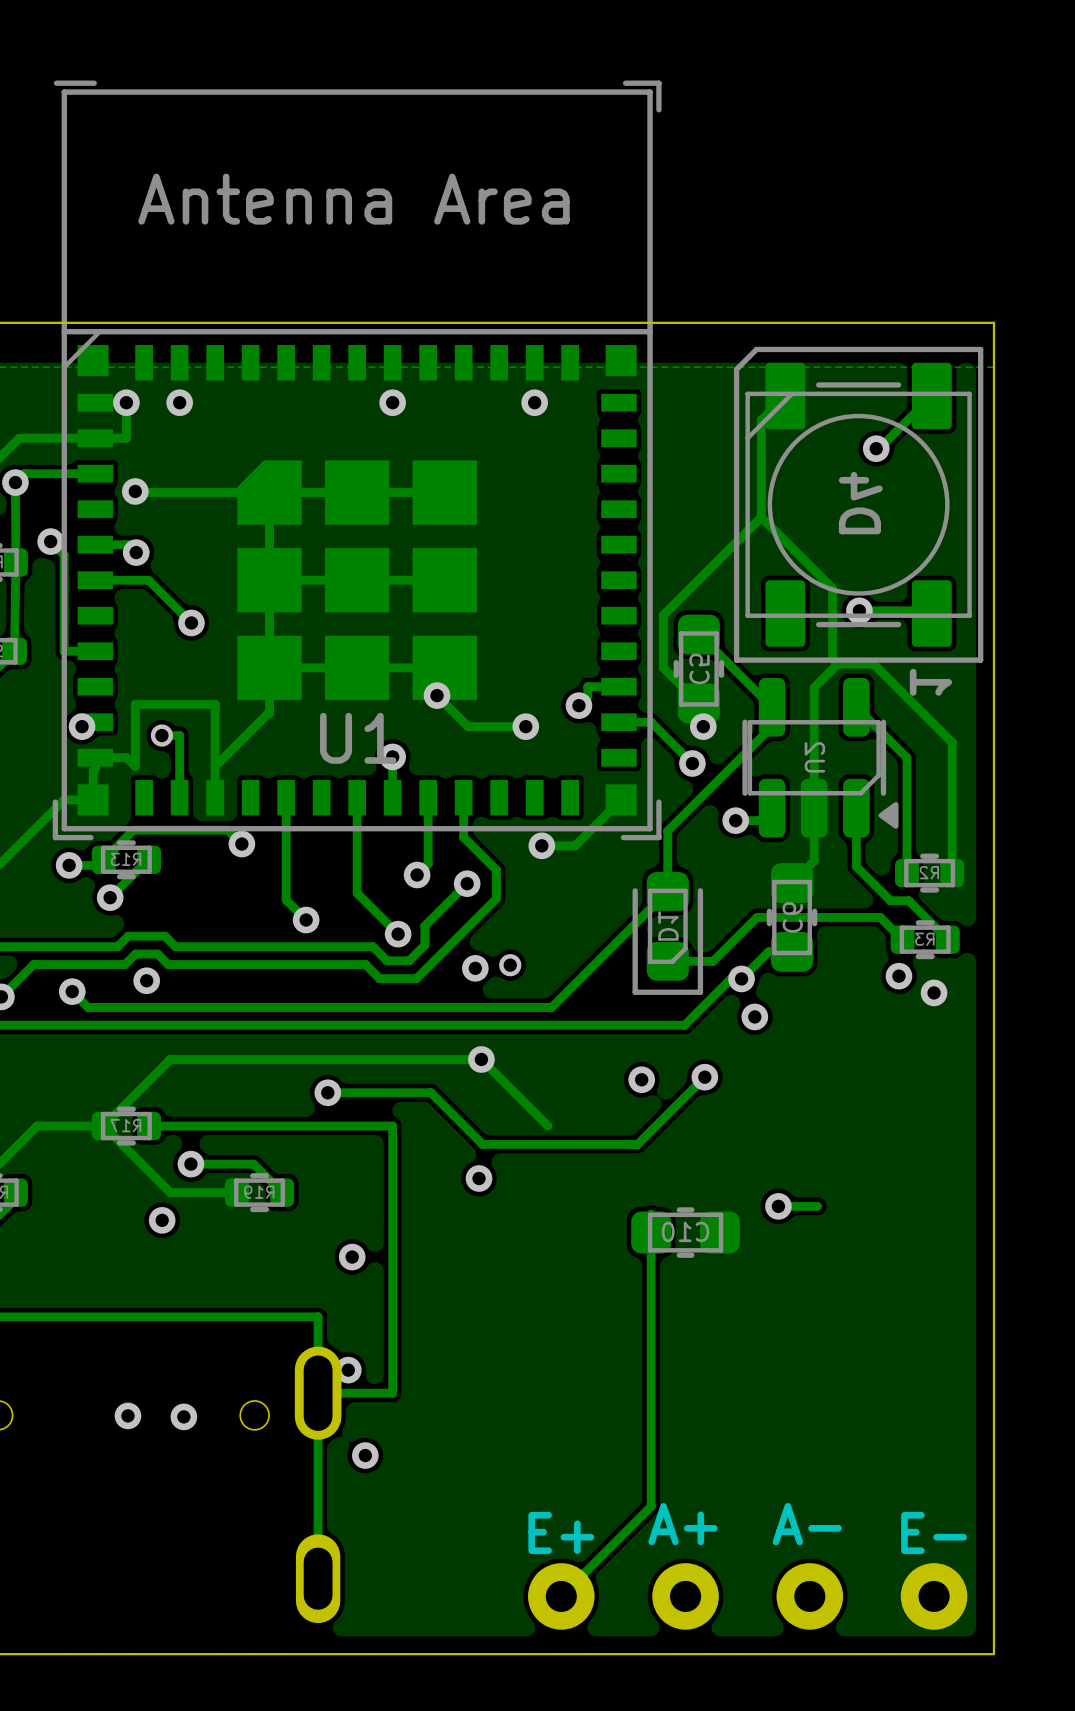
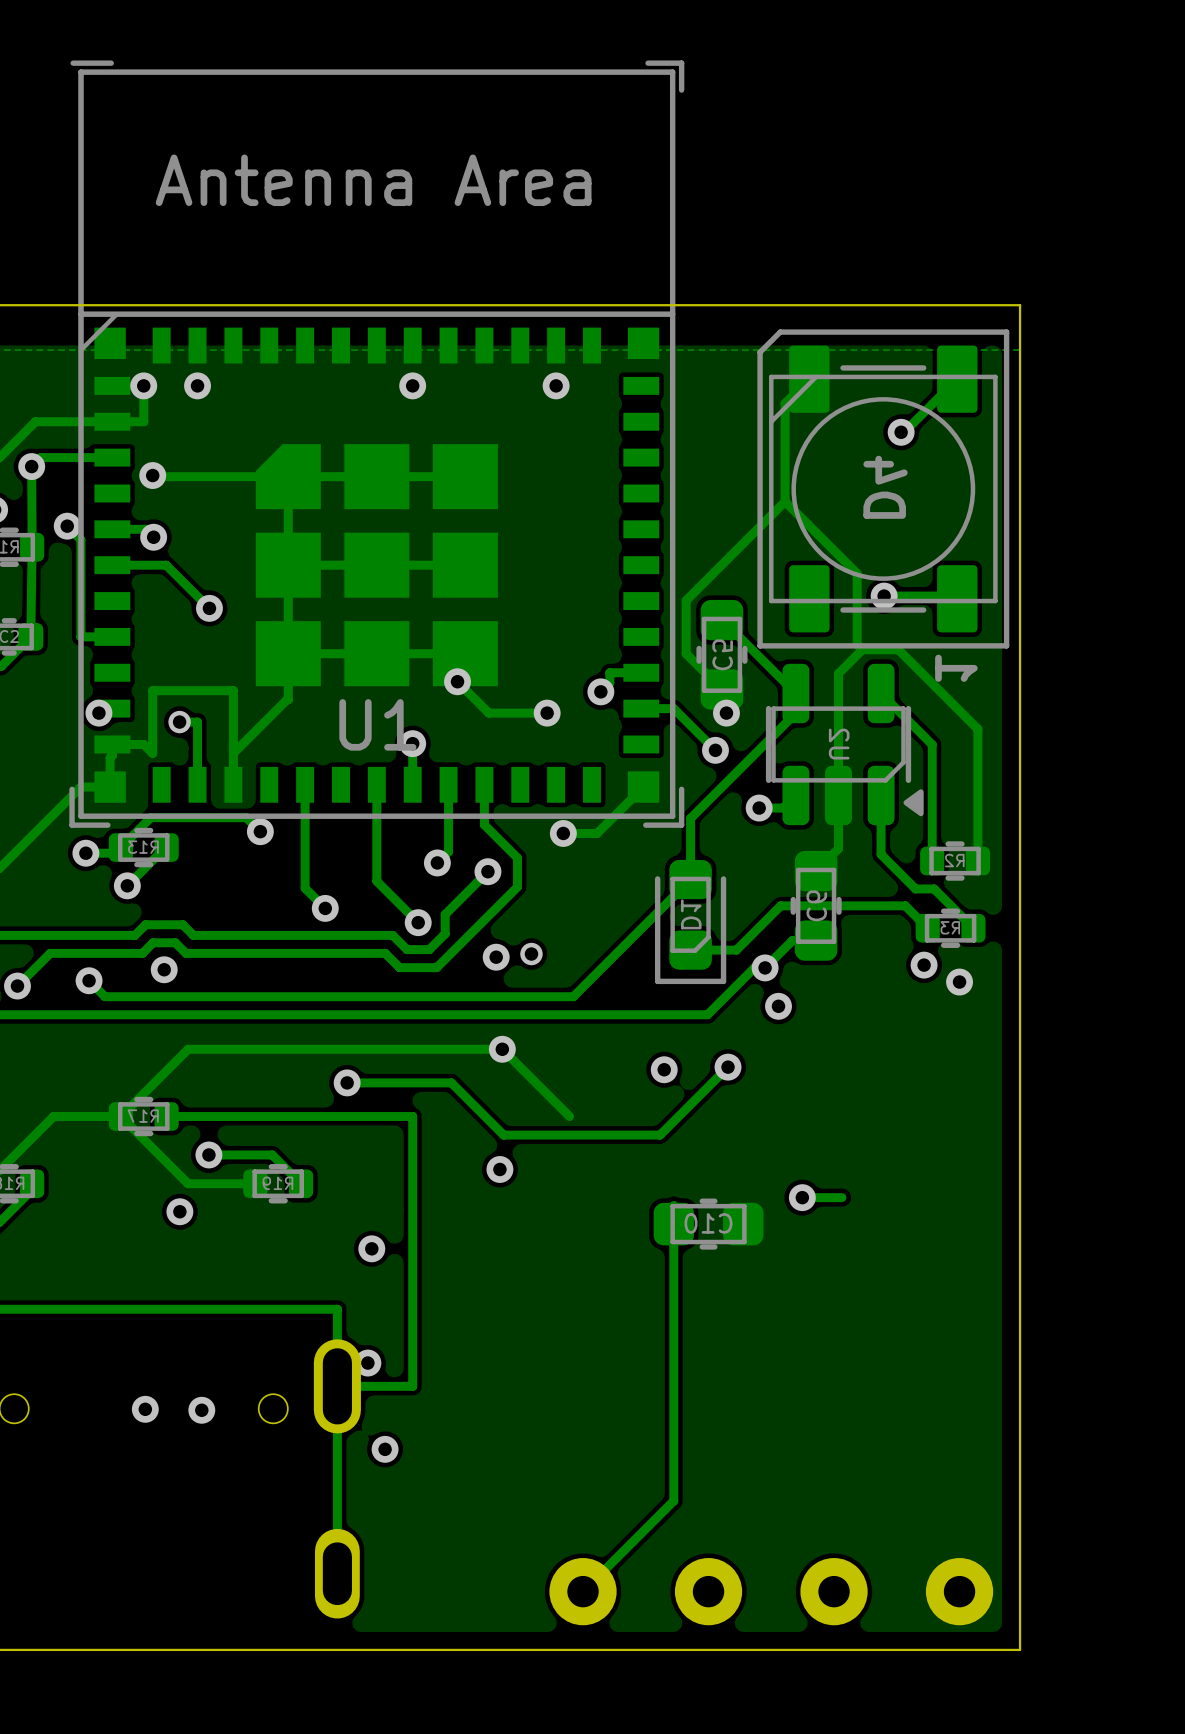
text: A+ (683, 1524) -> none
text: A- (807, 1524) -> none
text: E+ (561, 1532) -> none
text: E- (934, 1532) -> none

